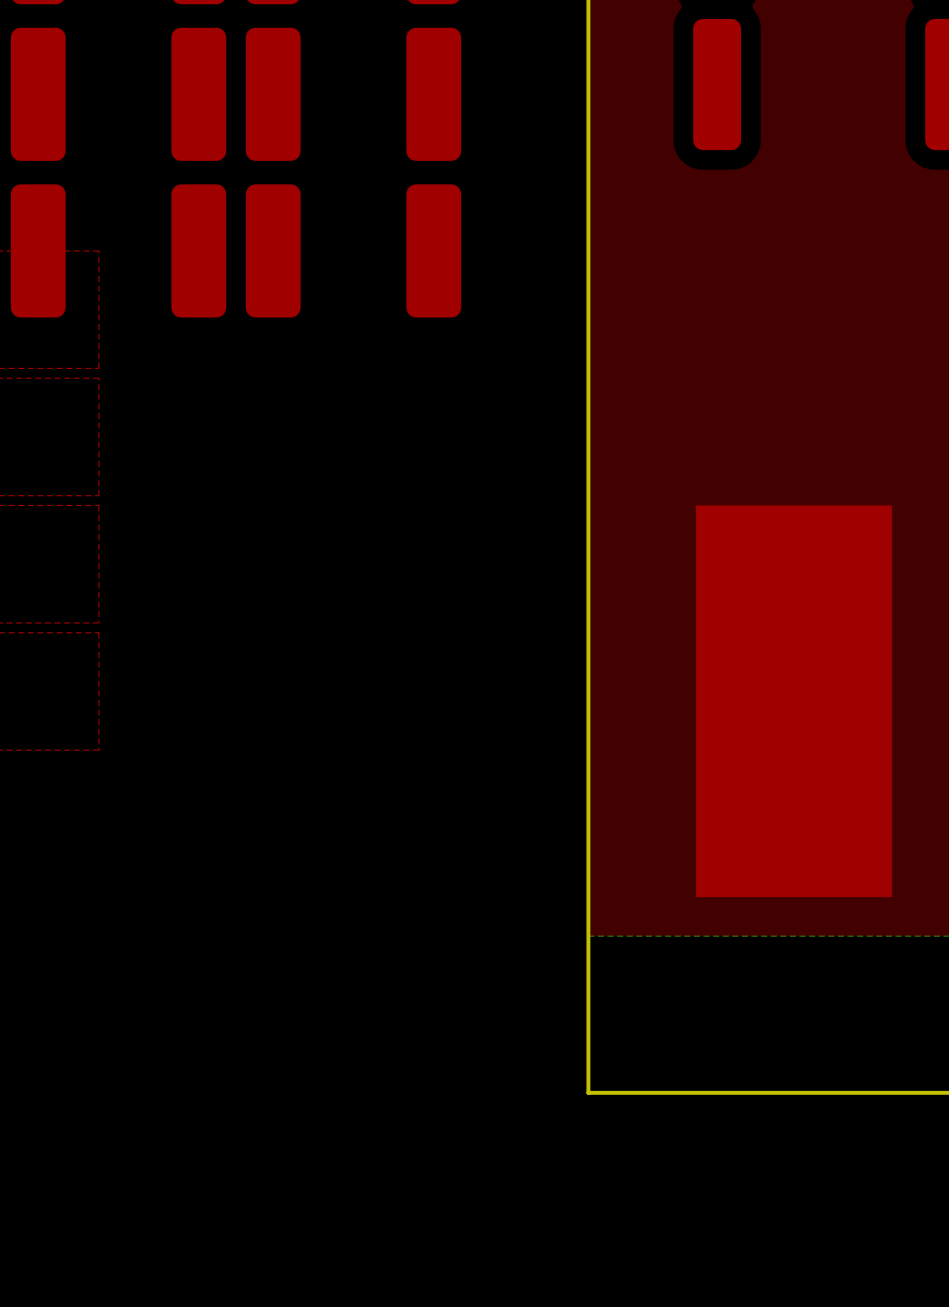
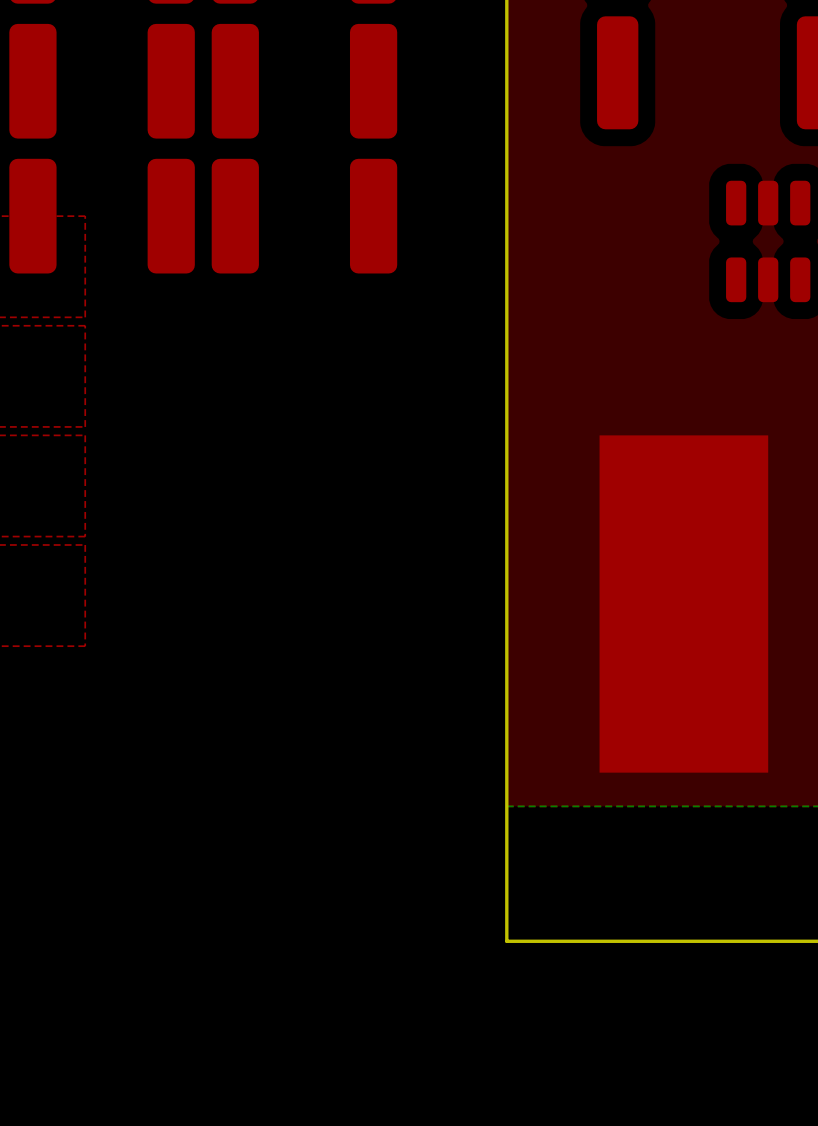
part: none -> (768, 241)

